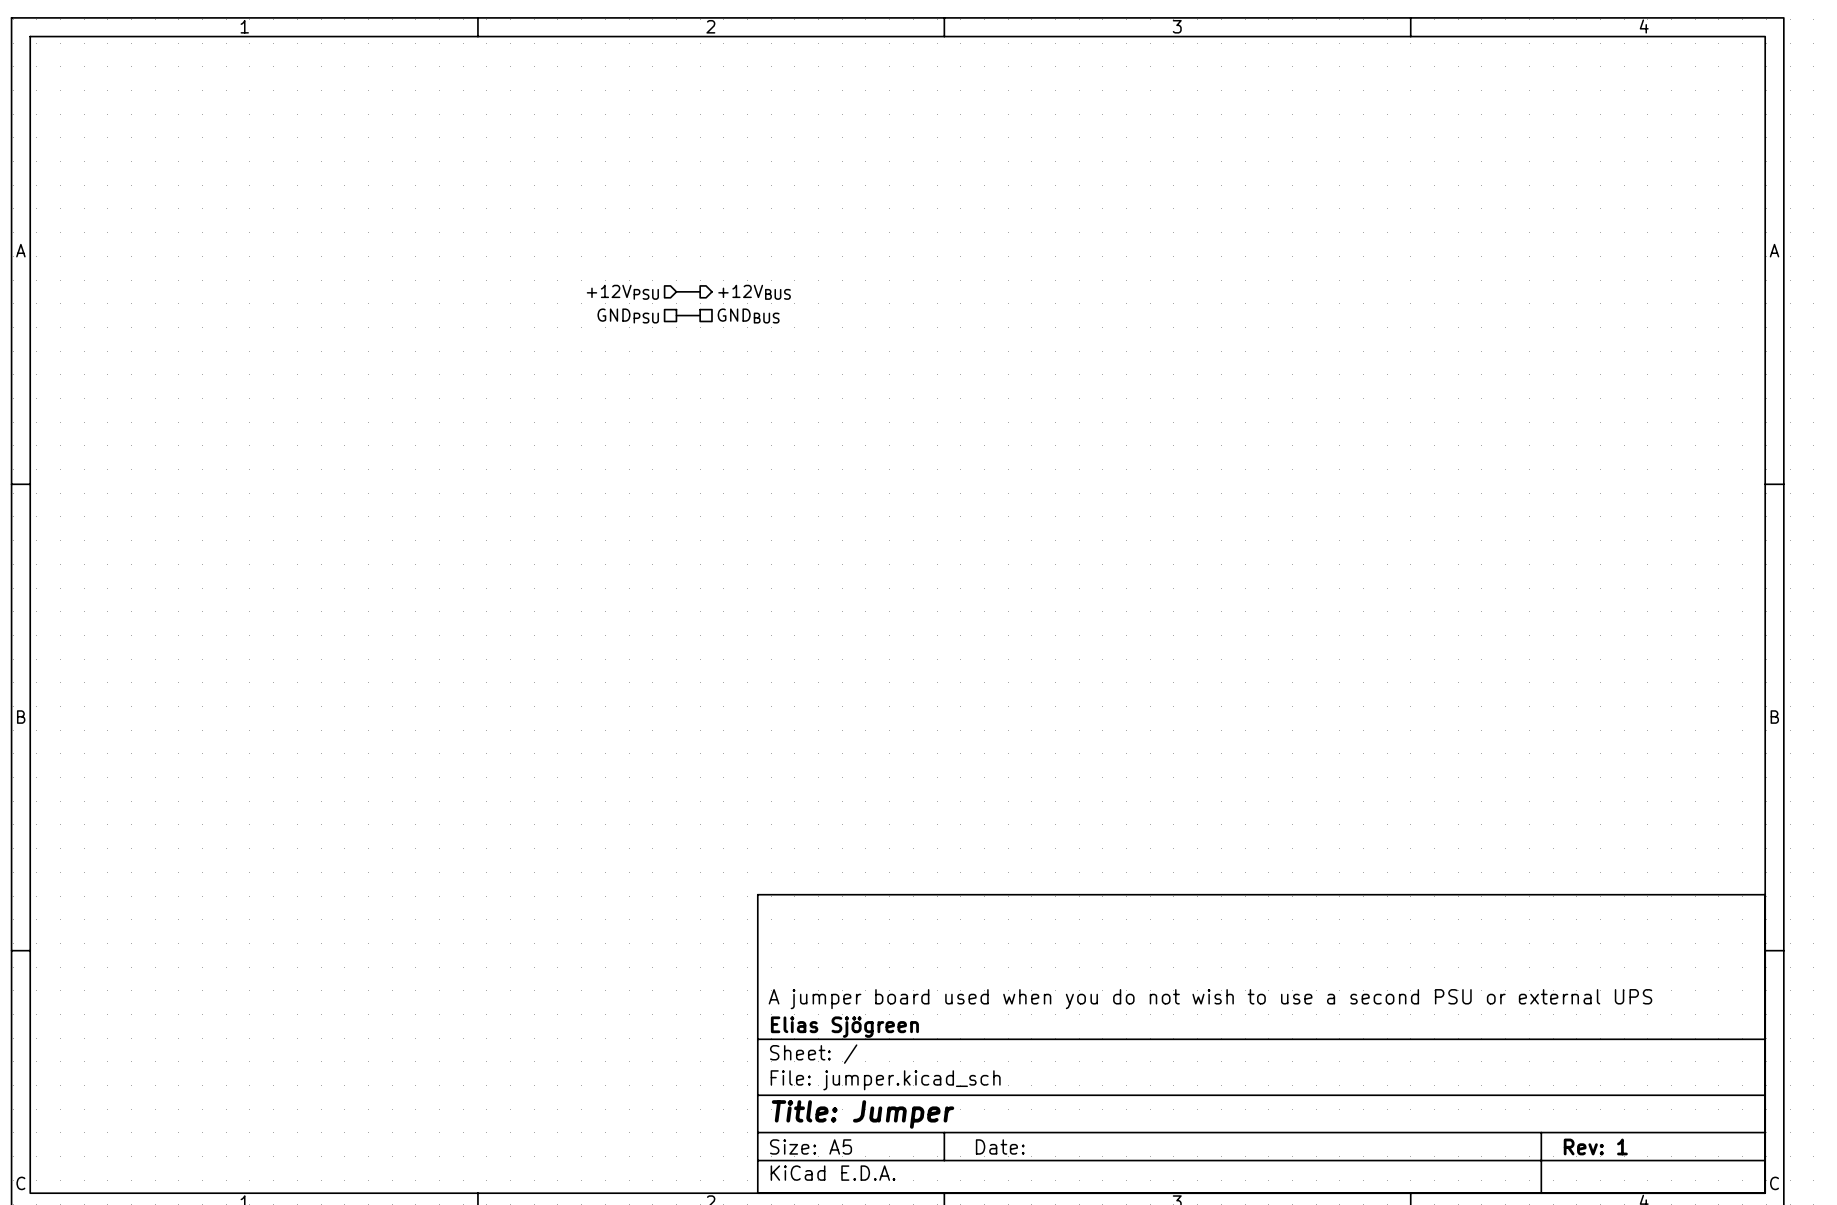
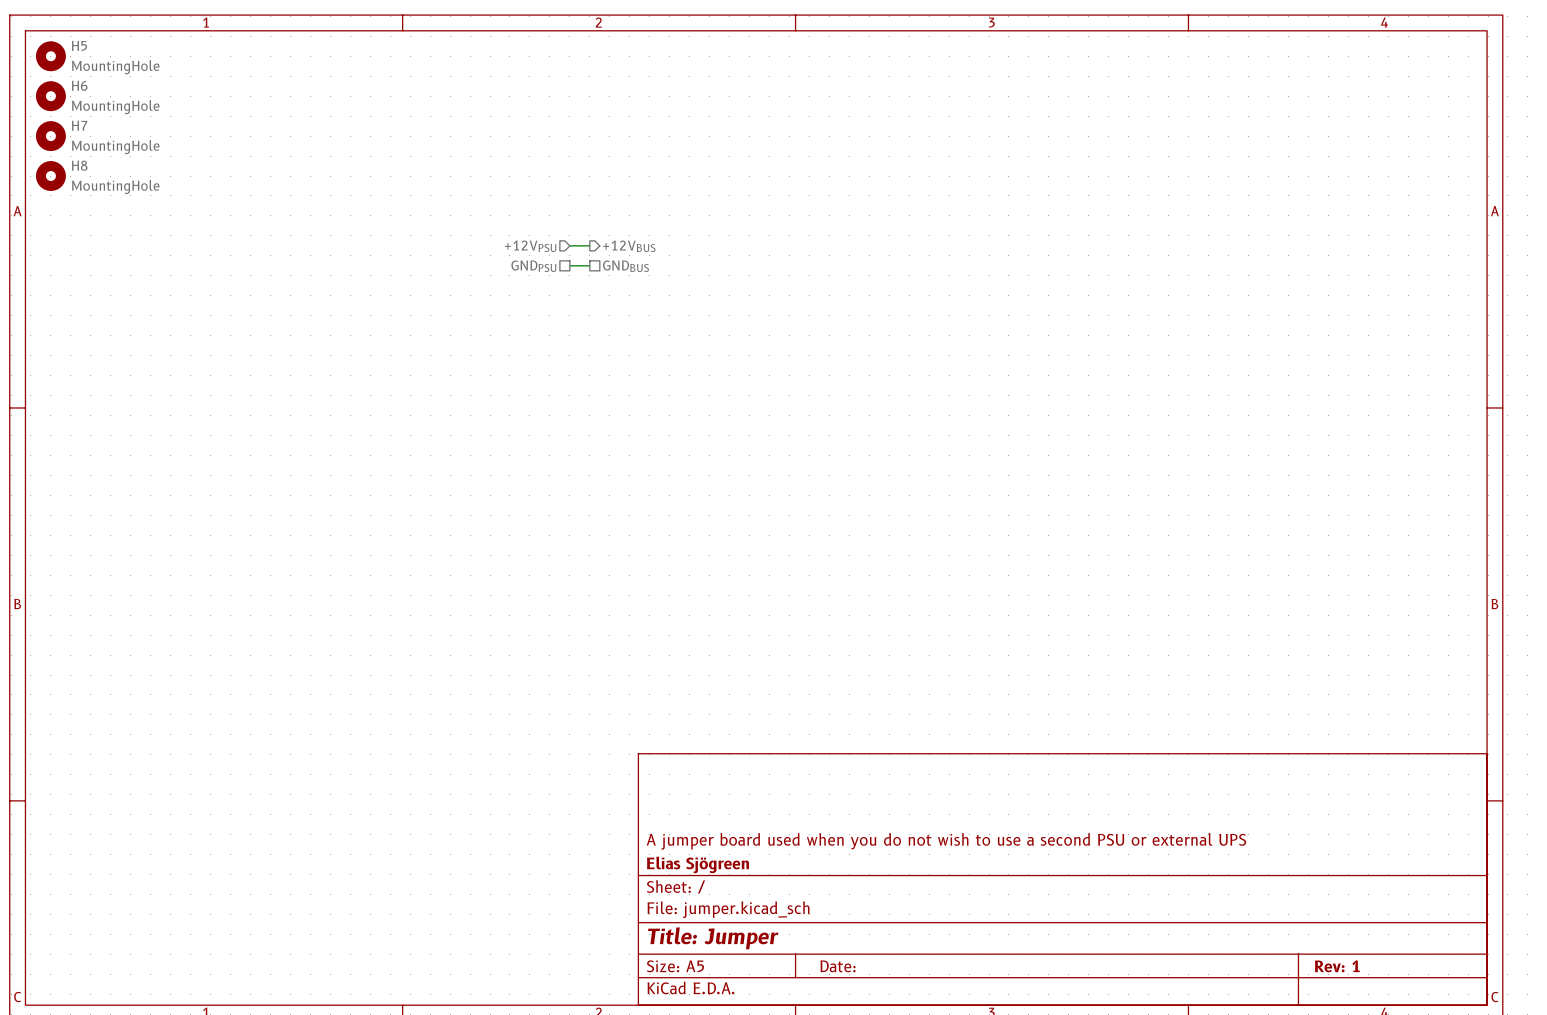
H5: none -> MountingHole (50, 56)
H6: none -> MountingHole (50, 96)
H7: none -> MountingHole (50, 136)
H8: none -> MountingHole (50, 176)

